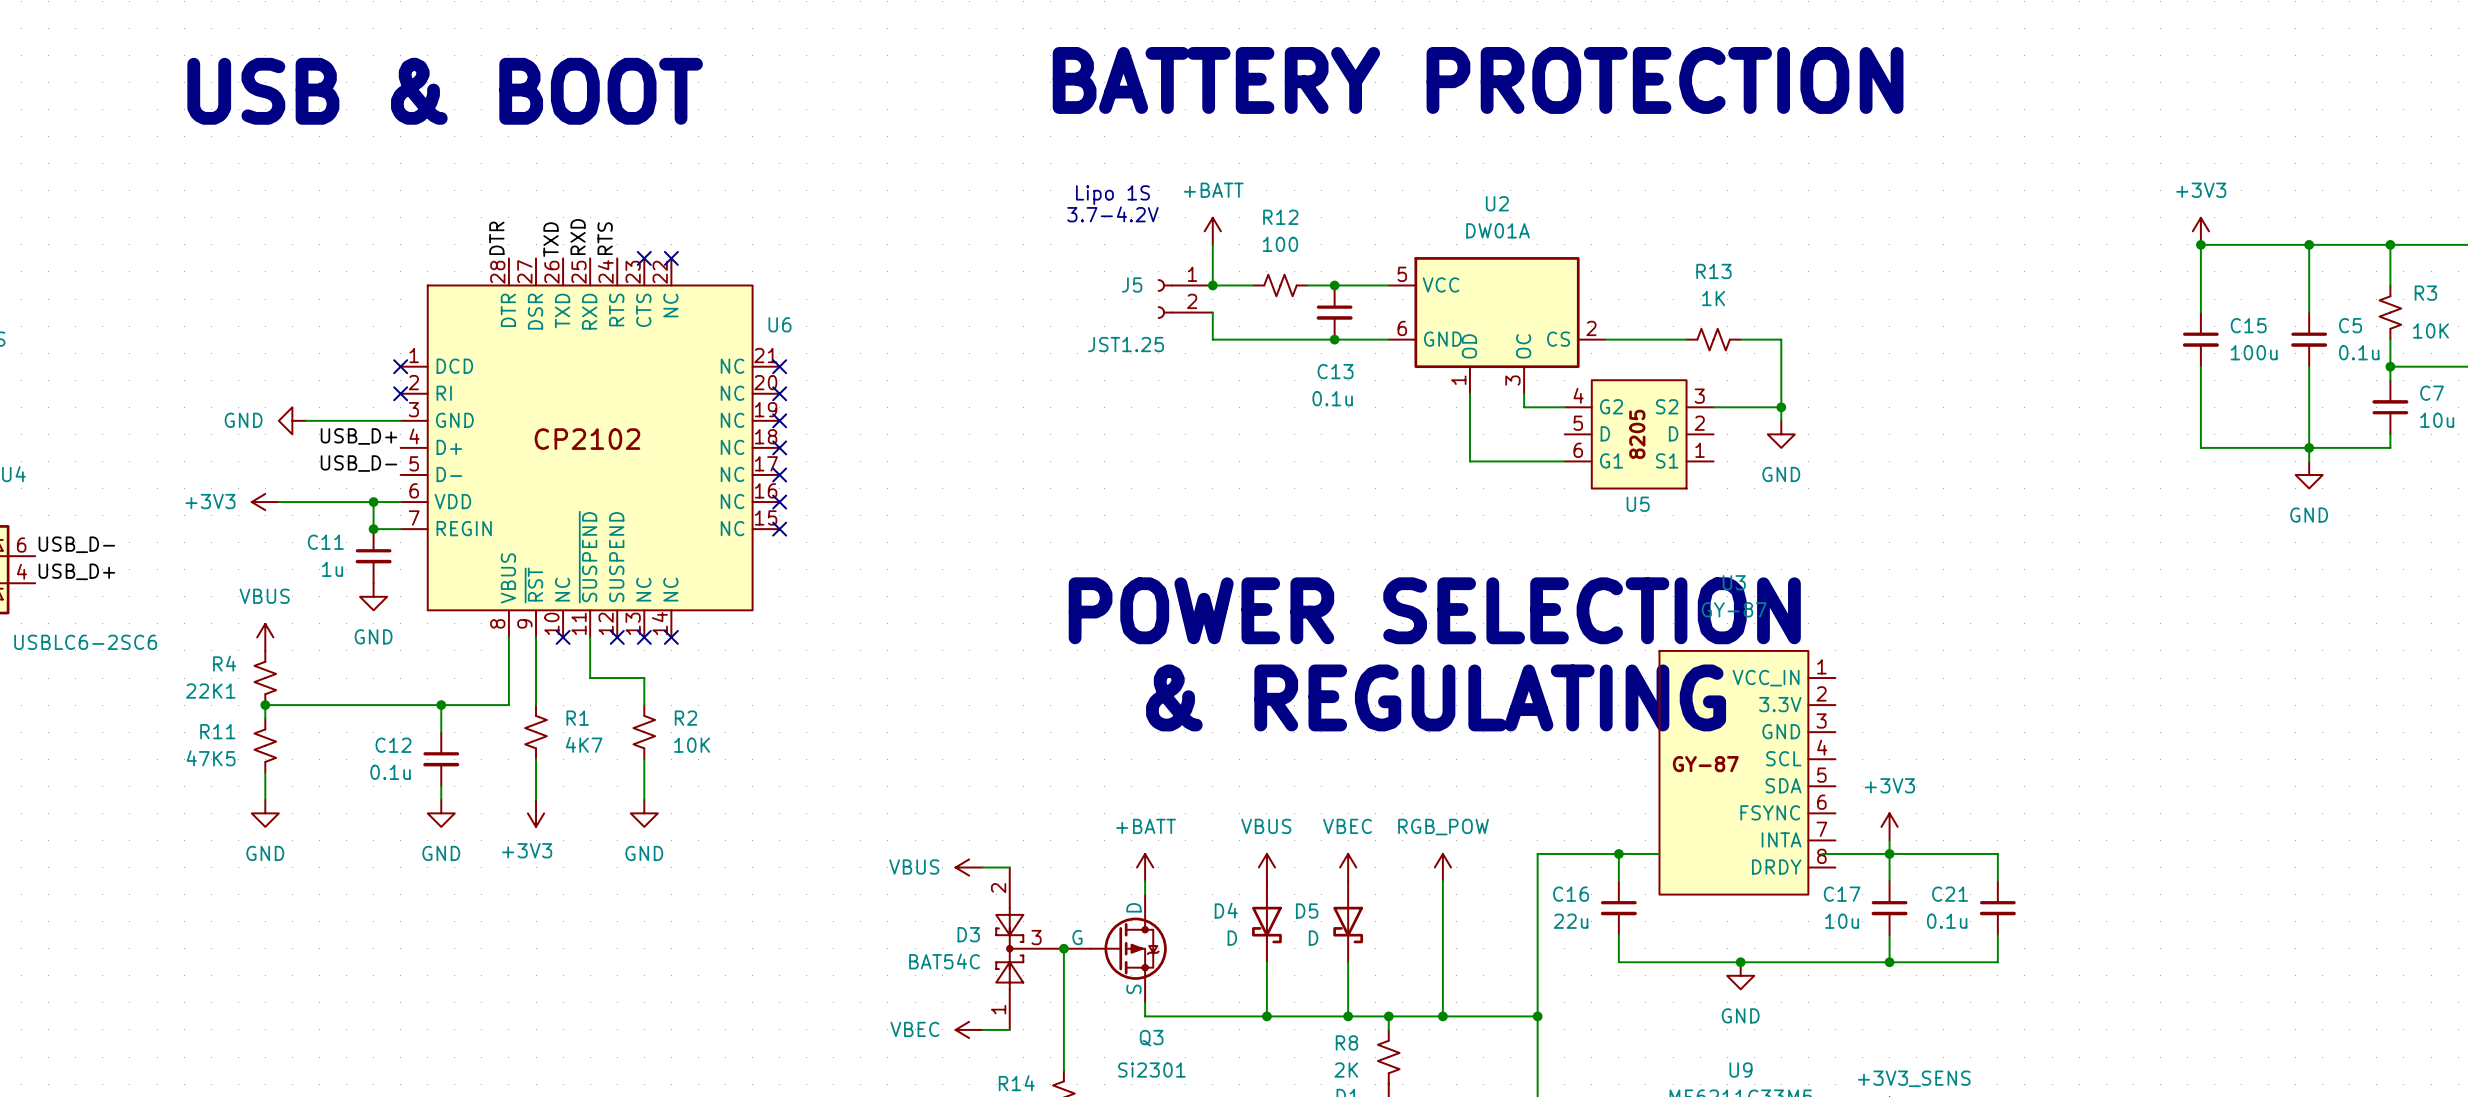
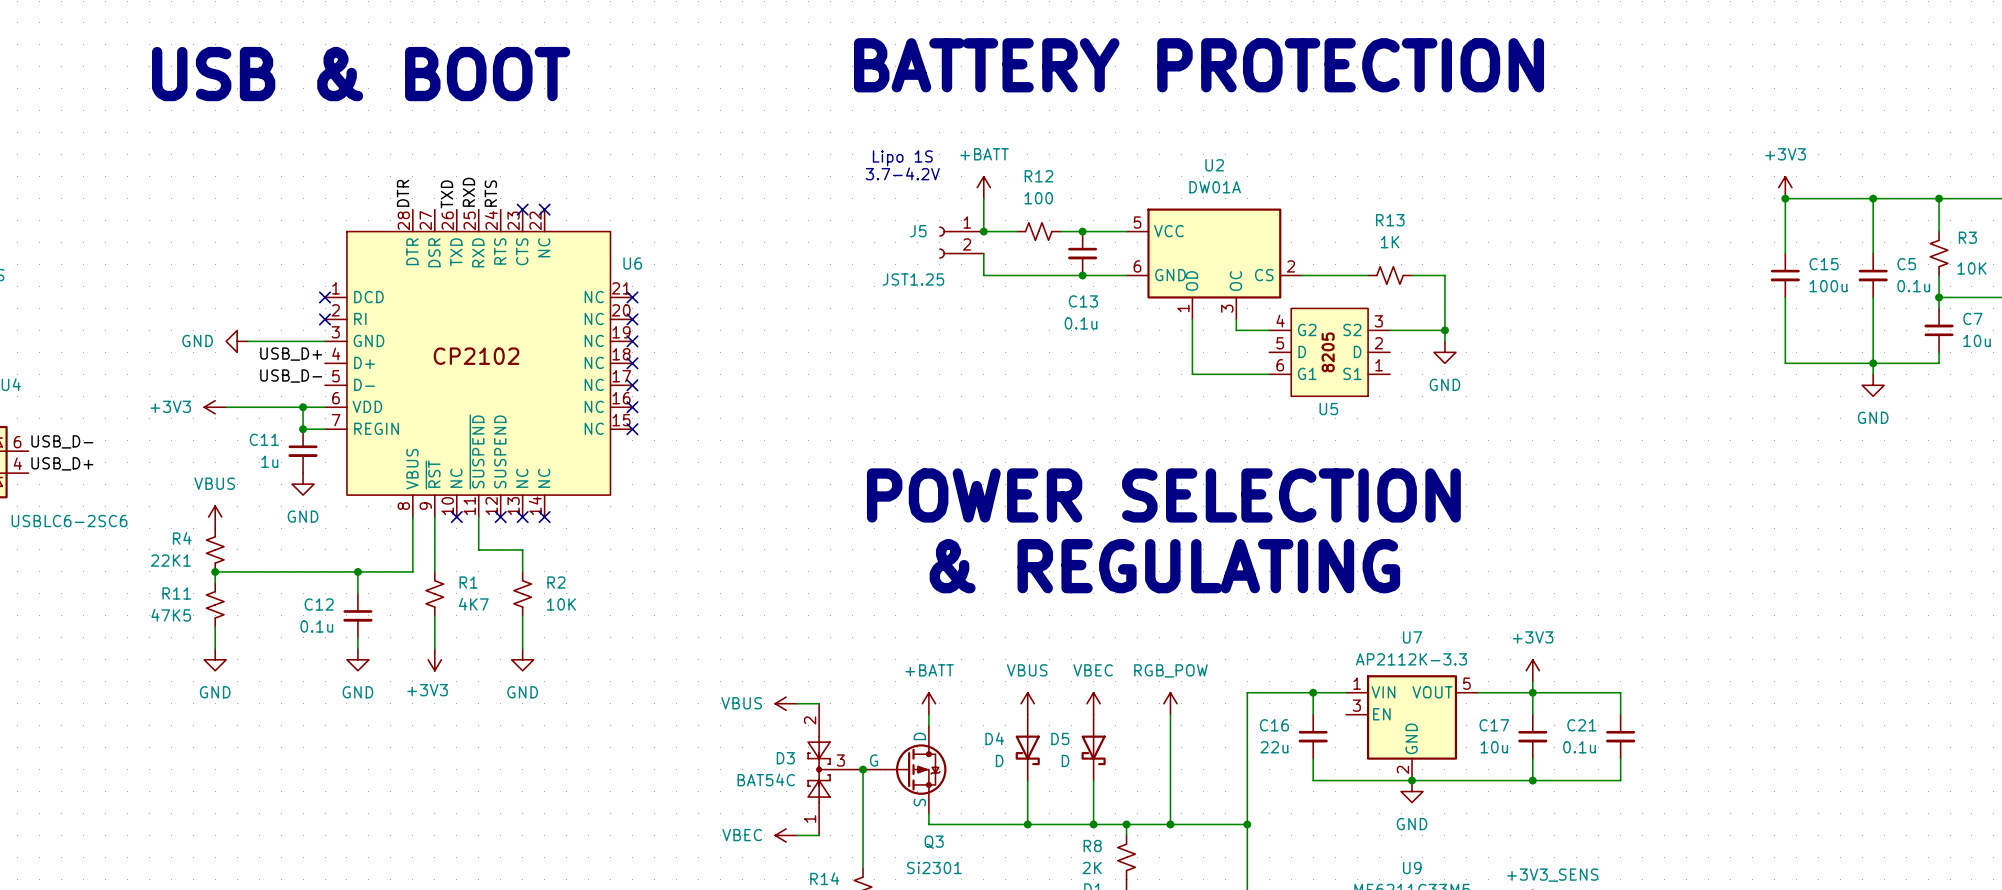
U3: GY-87 (1747, 772) -> none
U7: none -> AP2112K-3.3 (1412, 727)

